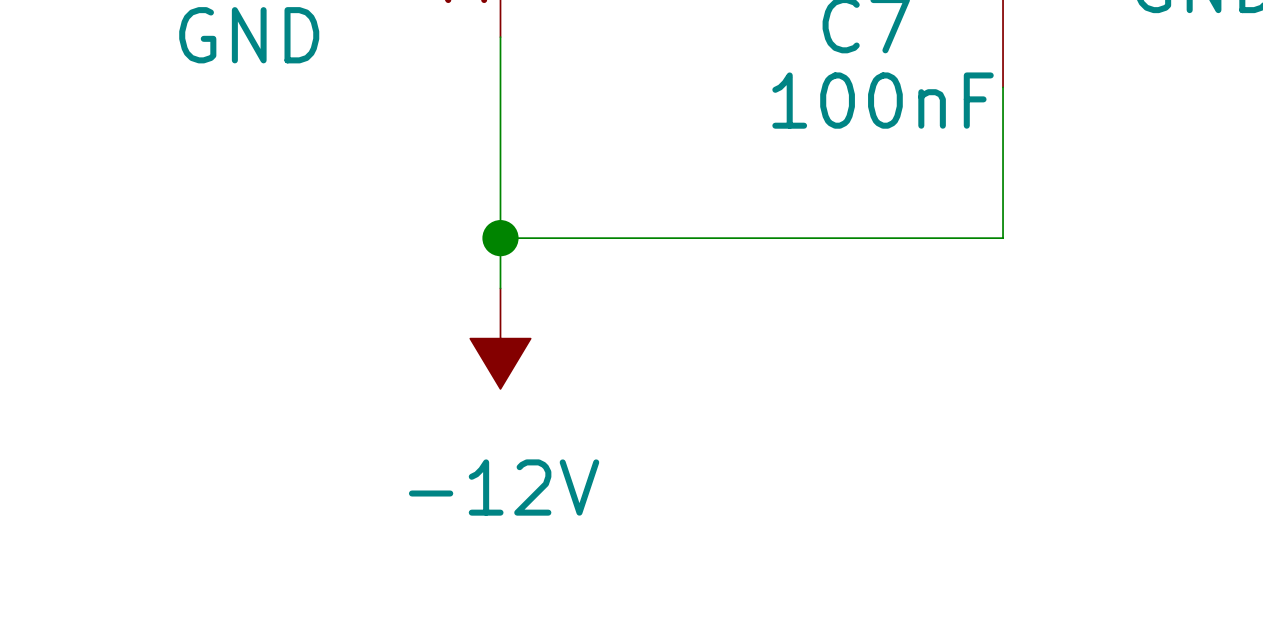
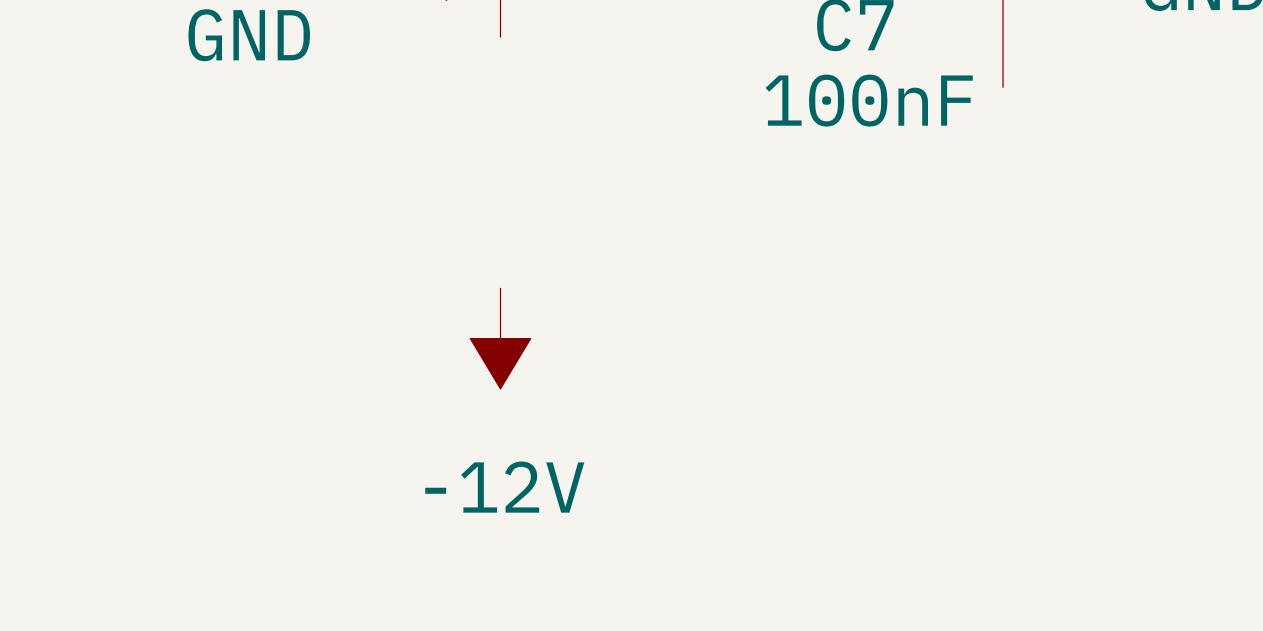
wire: (500, 37) (500, 288) -> none
wire: (1003, 87) (1003, 238) (500, 238) -> none
junction: (500, 238) -> none

